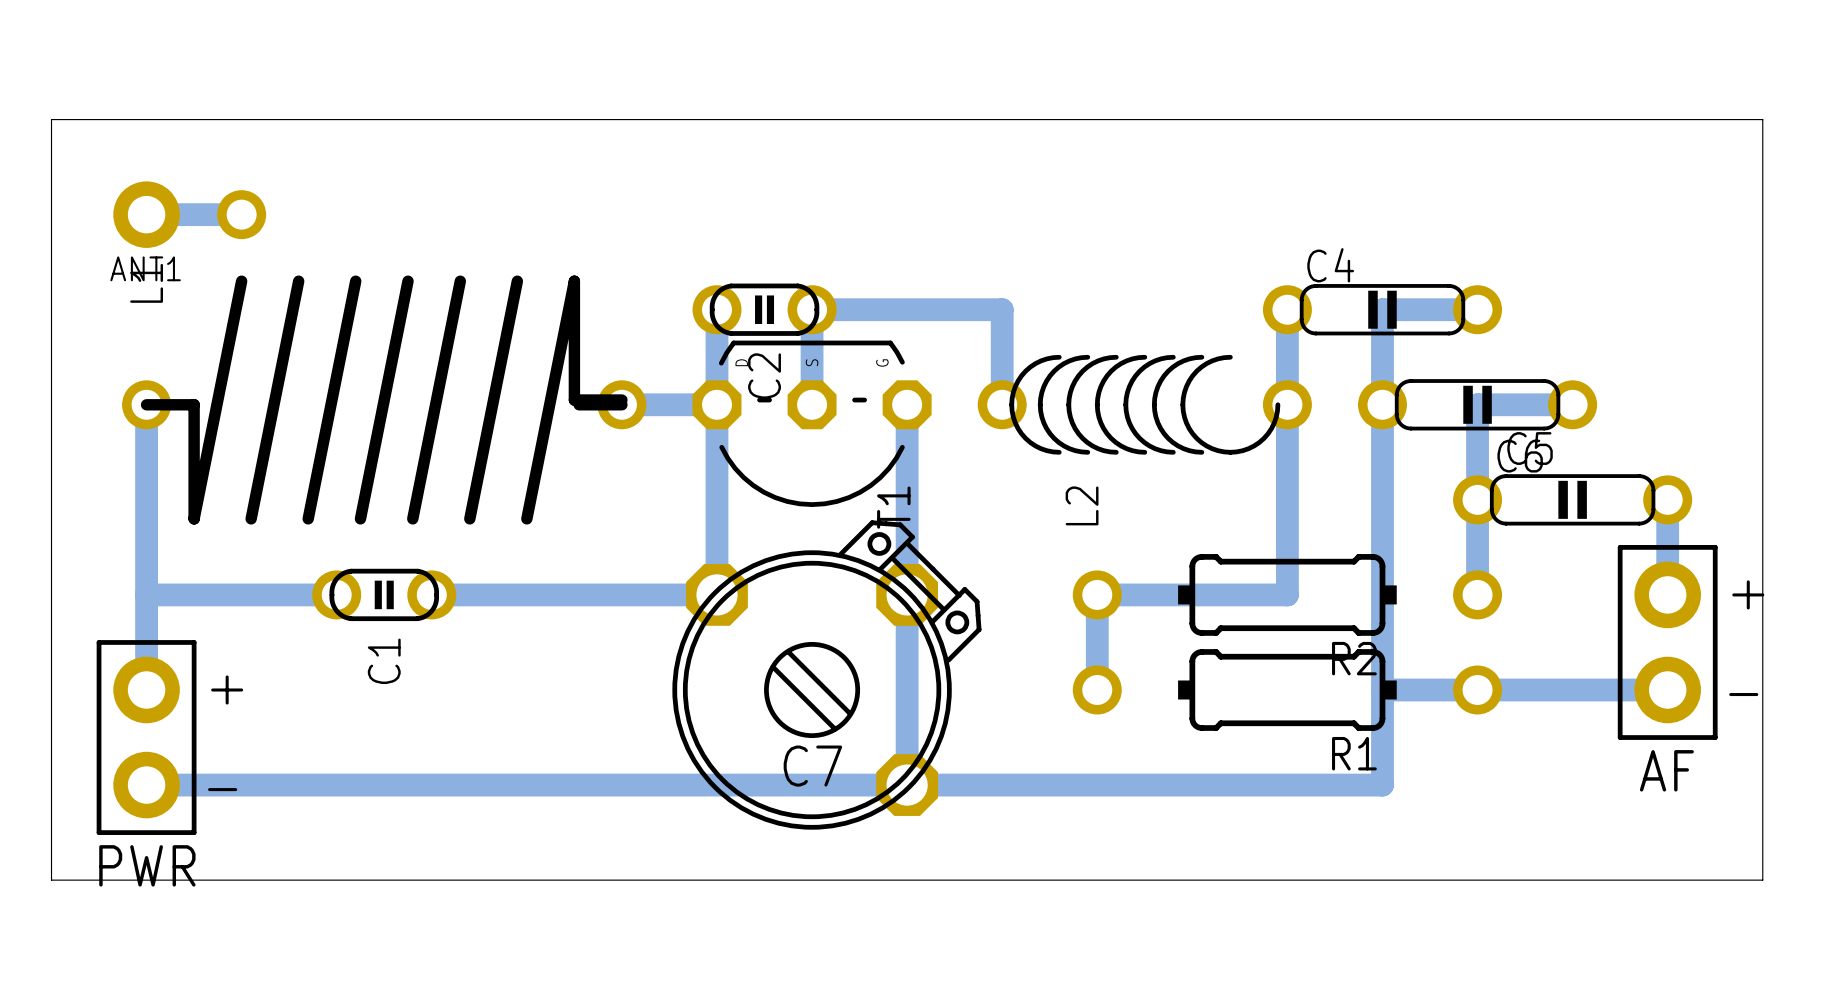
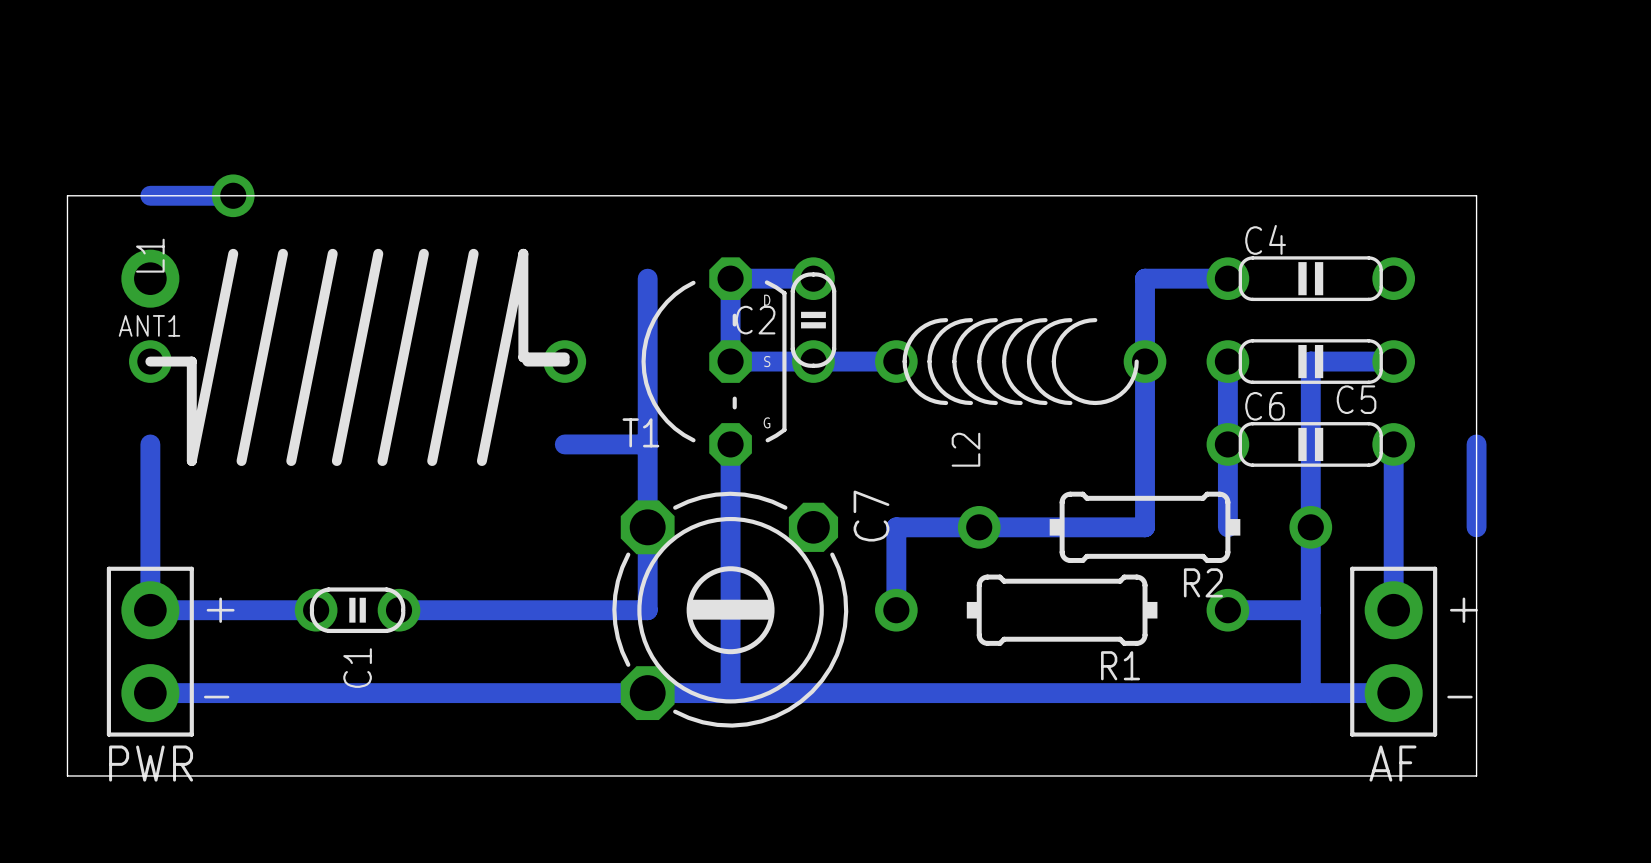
board edge: (51, 214) (51, 119) (1762, 119) (1762, 880) (1667, 880) -> (67, 195) (1476, 195) (1476, 775)
ANT1 position: (146, 214) -> (150, 278)
C2 rotation: 0° (764, 309) -> 90° clockwise (813, 320)
C2 position: (764, 309) -> (813, 320)
bottom track: (907, 309) (1002, 309) (1002, 404) -> (730, 361) (896, 361)
bottom track: none -> (1145, 278) (1227, 278)
C4 position: (1382, 309) -> (1310, 278)
bottom track: (1477, 309) (1382, 309) (1382, 404) -> none
bottom track: (146, 404) (146, 499) -> none
bottom track: (621, 404) (716, 404) -> (564, 444) (647, 444)
bottom track: (907, 404) (907, 785) -> none
T1 rotation: 0° (812, 423) -> 90° clockwise (714, 361)
bottom track: none -> (730, 444) (730, 693)
bottom track: none -> (1393, 444) (1393, 610)
C6 position: (1572, 499) -> (1310, 444)
C7 footprint: [672, 520, 982, 830] -> [612, 491, 849, 728]
bottom track: (146, 594) (336, 594) -> (150, 610) (316, 610)
C1 position: (384, 594) -> (357, 610)
bottom track: (431, 594) (716, 594) -> (399, 610) (647, 610) (647, 527)
bottom track: (1097, 594) (1097, 690) -> (979, 527) (896, 527) (896, 610)
bottom track: (1382, 594) (1382, 785) -> (1393, 693) (1227, 693)
bottom track: none -> (1310, 527) (1310, 693)
AF position: (1667, 642) -> (1393, 651)
R1 position: (1287, 690) -> (1062, 610)
bottom track: (1477, 690) (1667, 690) -> none
C7 name position: C7 (812, 766) -> C7 (871, 516)

